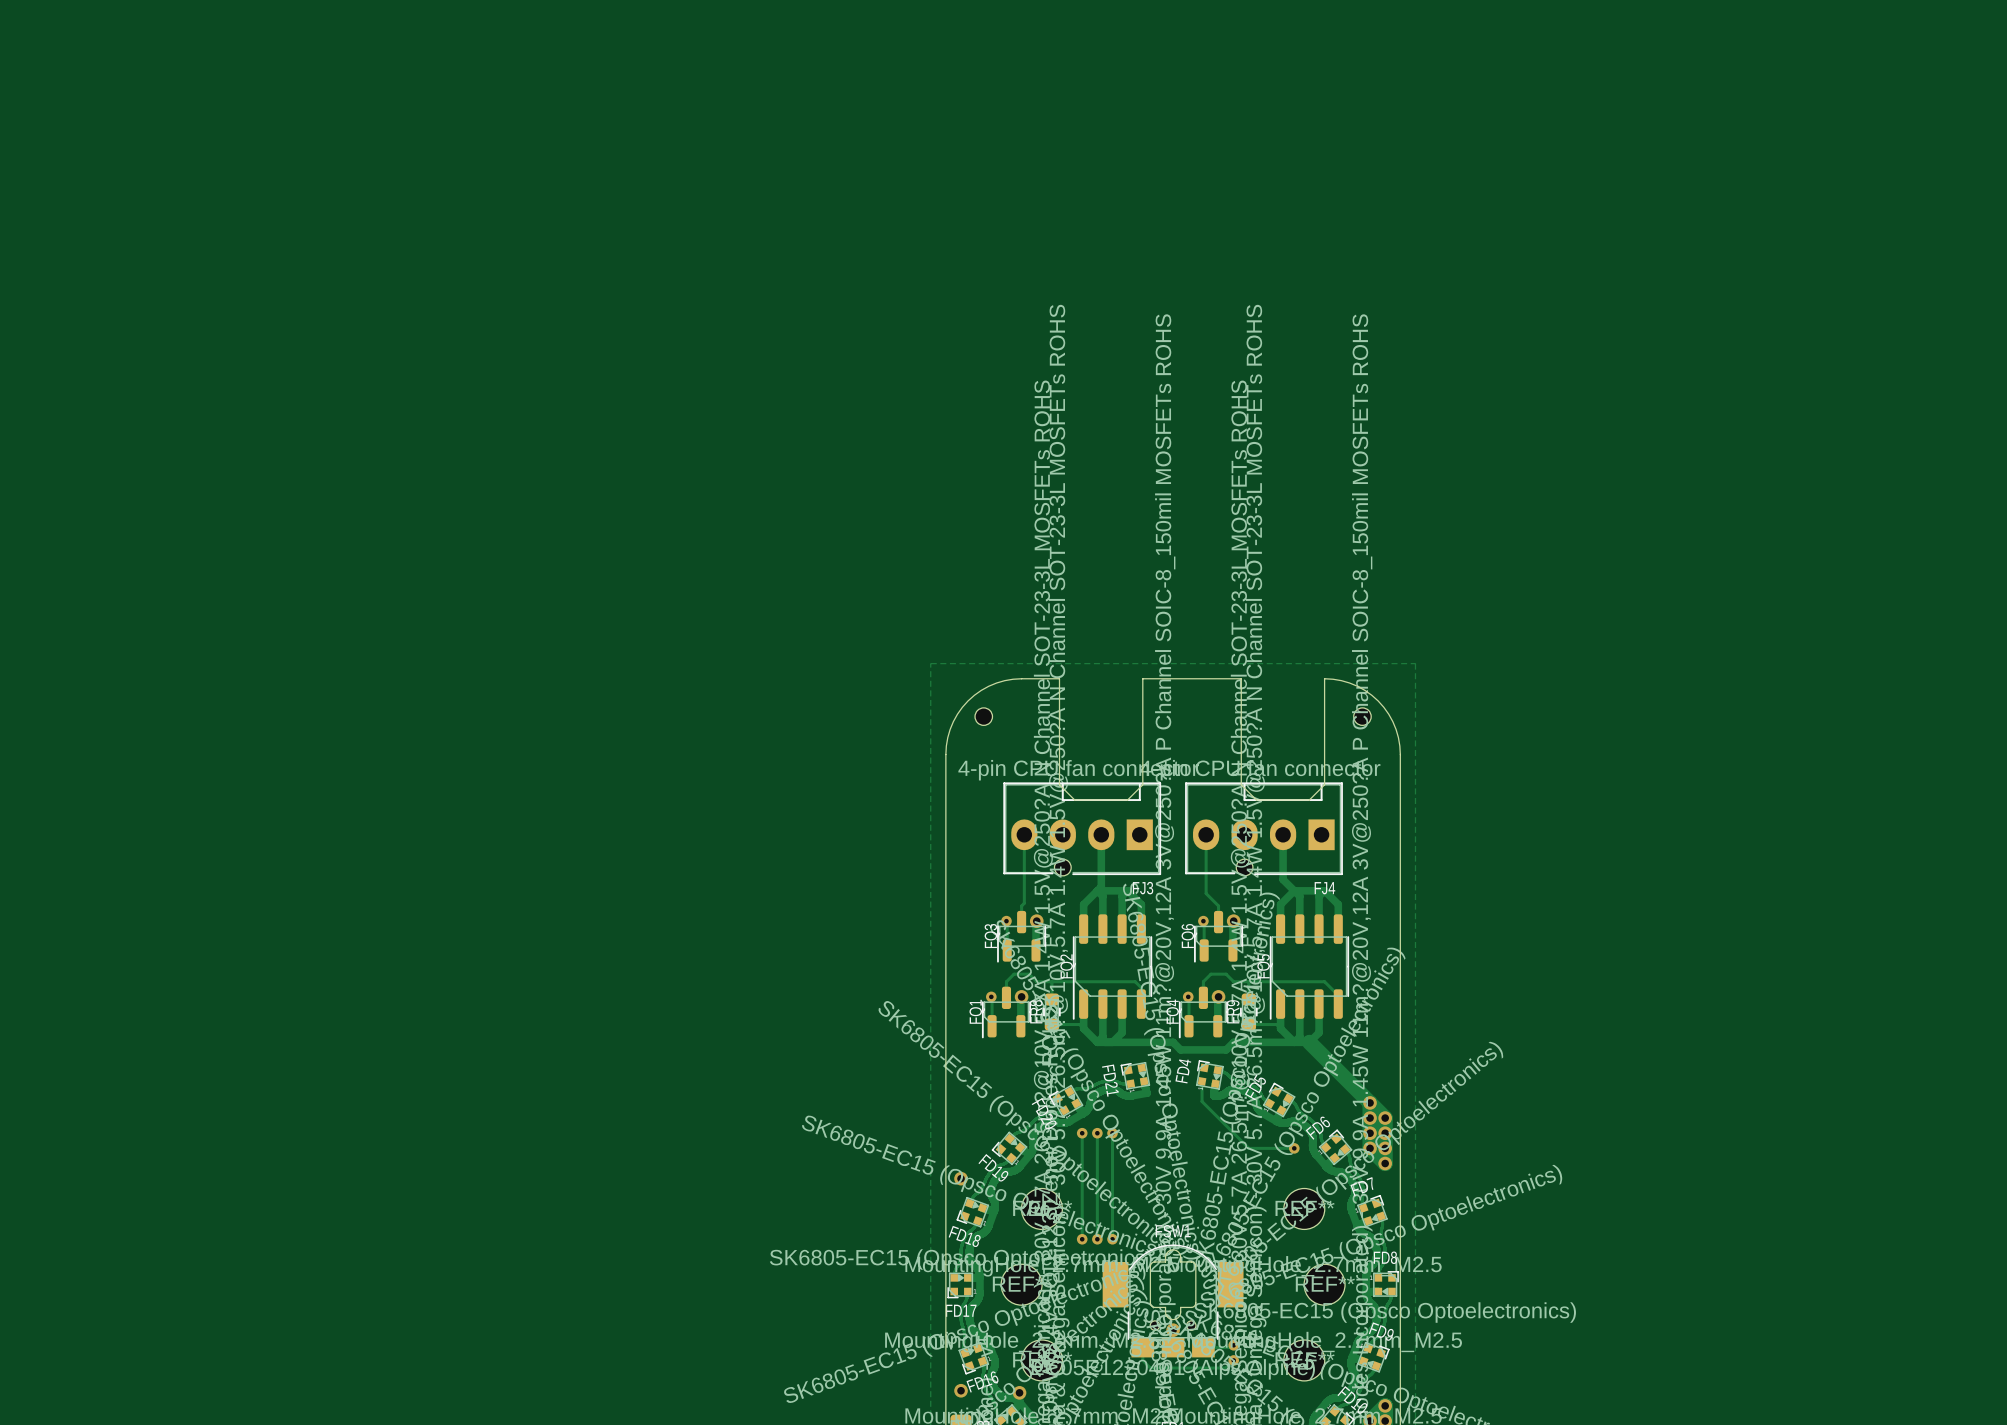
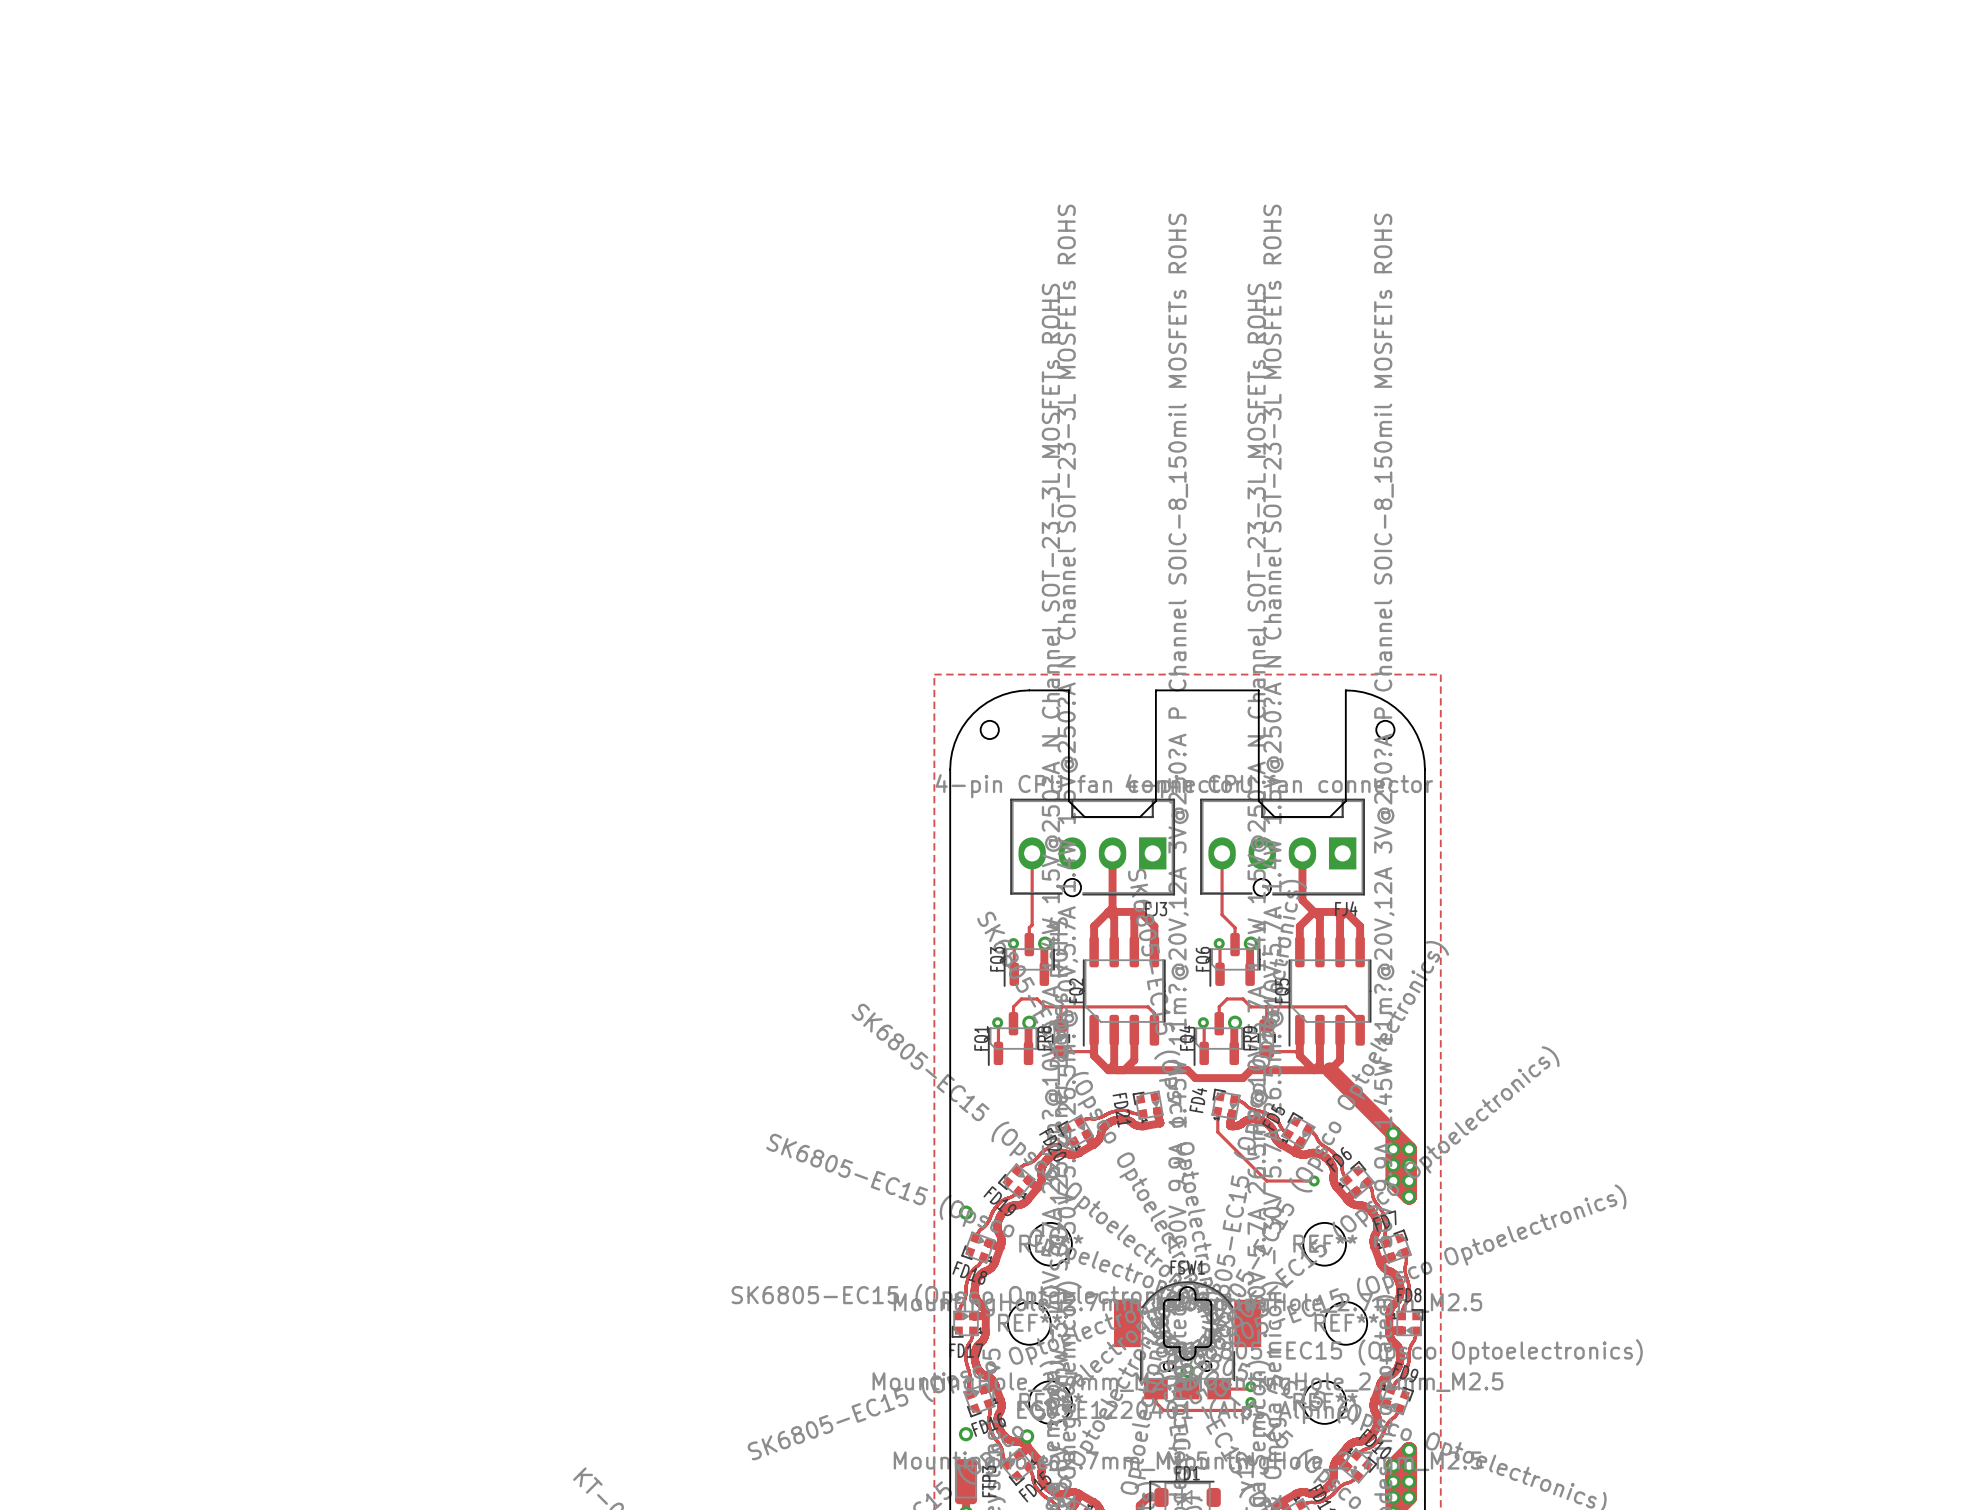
track: (1082, 1133) (1082, 1239) -> none
via: (1082, 1133) -> none
track: (1097, 1133) (1097, 1239) -> none
via: (1097, 1133) -> none
track: (1112, 1133) (1112, 1239) -> none
via: (1112, 1133) -> none
via: (1082, 1239) -> none
via: (1097, 1239) -> none
via: (1112, 1239) -> none

